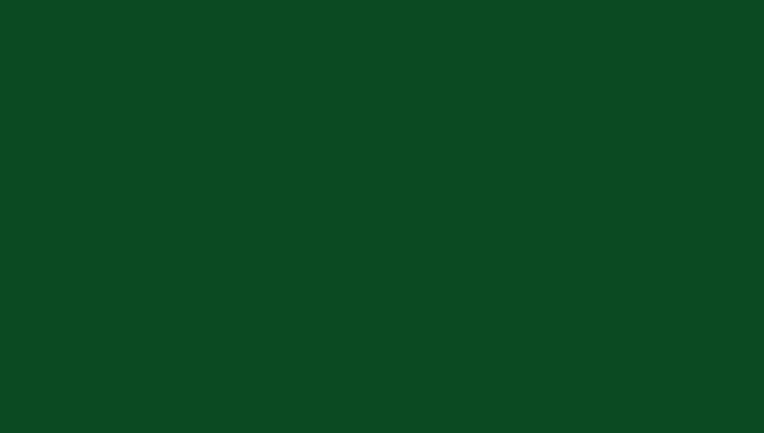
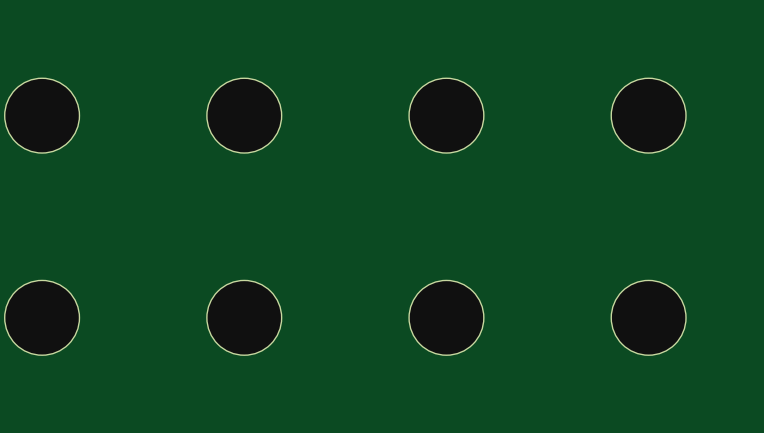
part: none -> (42, 115)
part: none -> (244, 115)
part: none -> (446, 115)
part: none -> (648, 115)
part: none -> (42, 317)
part: none -> (244, 317)
part: none -> (446, 317)
part: none -> (648, 317)

